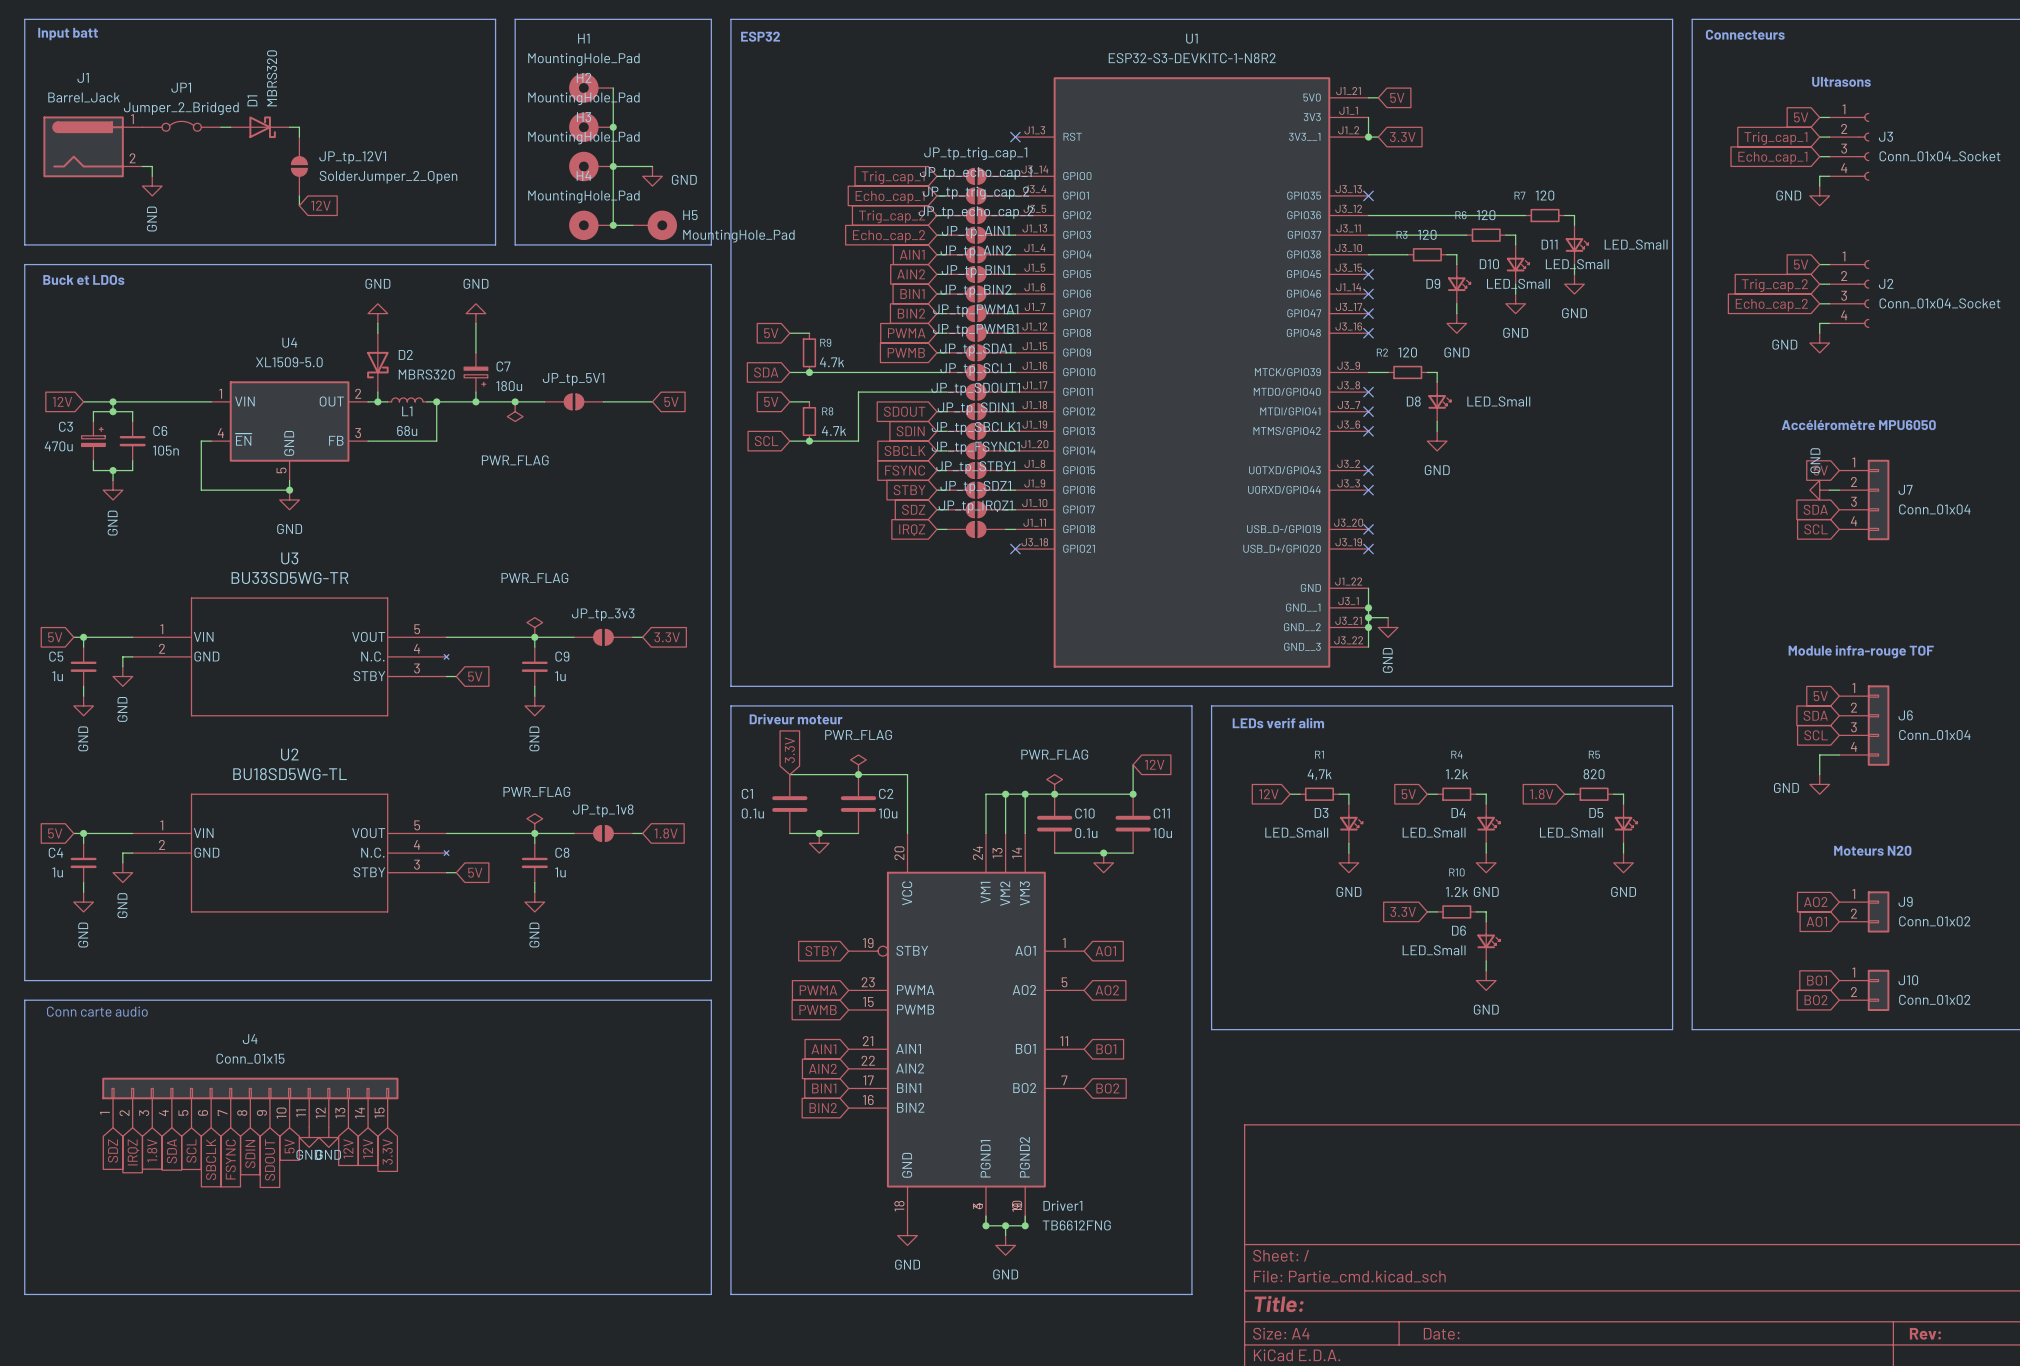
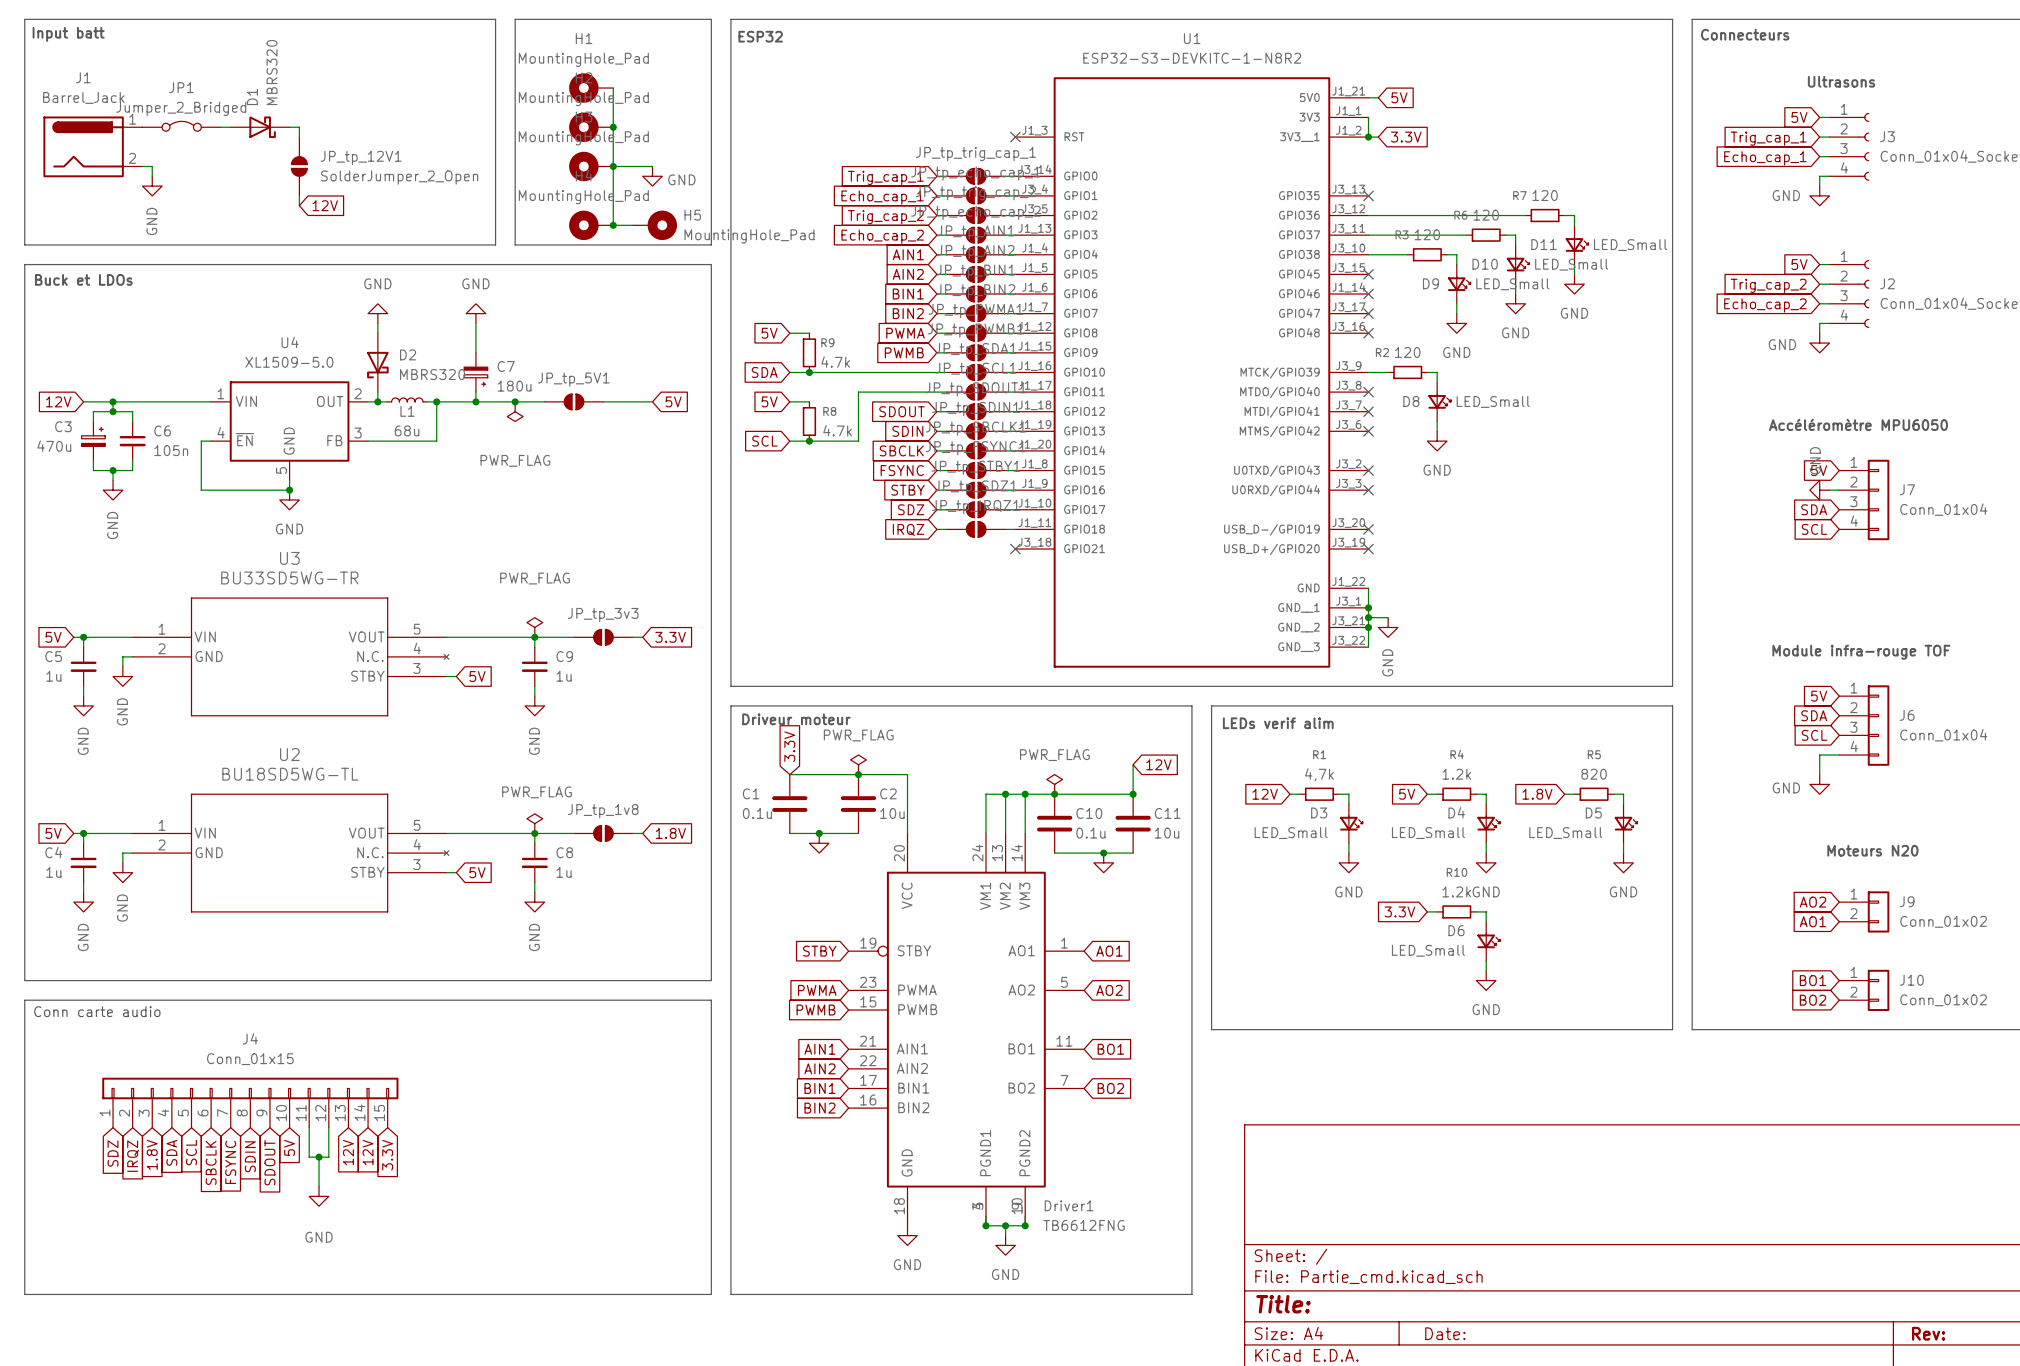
wire: none -> (309, 1127) (309, 1157) (328, 1157) (328, 1127)
power symbol: GND (309, 1137) -> none
power symbol: GND (328, 1137) -> none
wire: none -> (319, 1157) (319, 1186)
junction: none -> (319, 1157)
power symbol: none -> GND (319, 1196)

